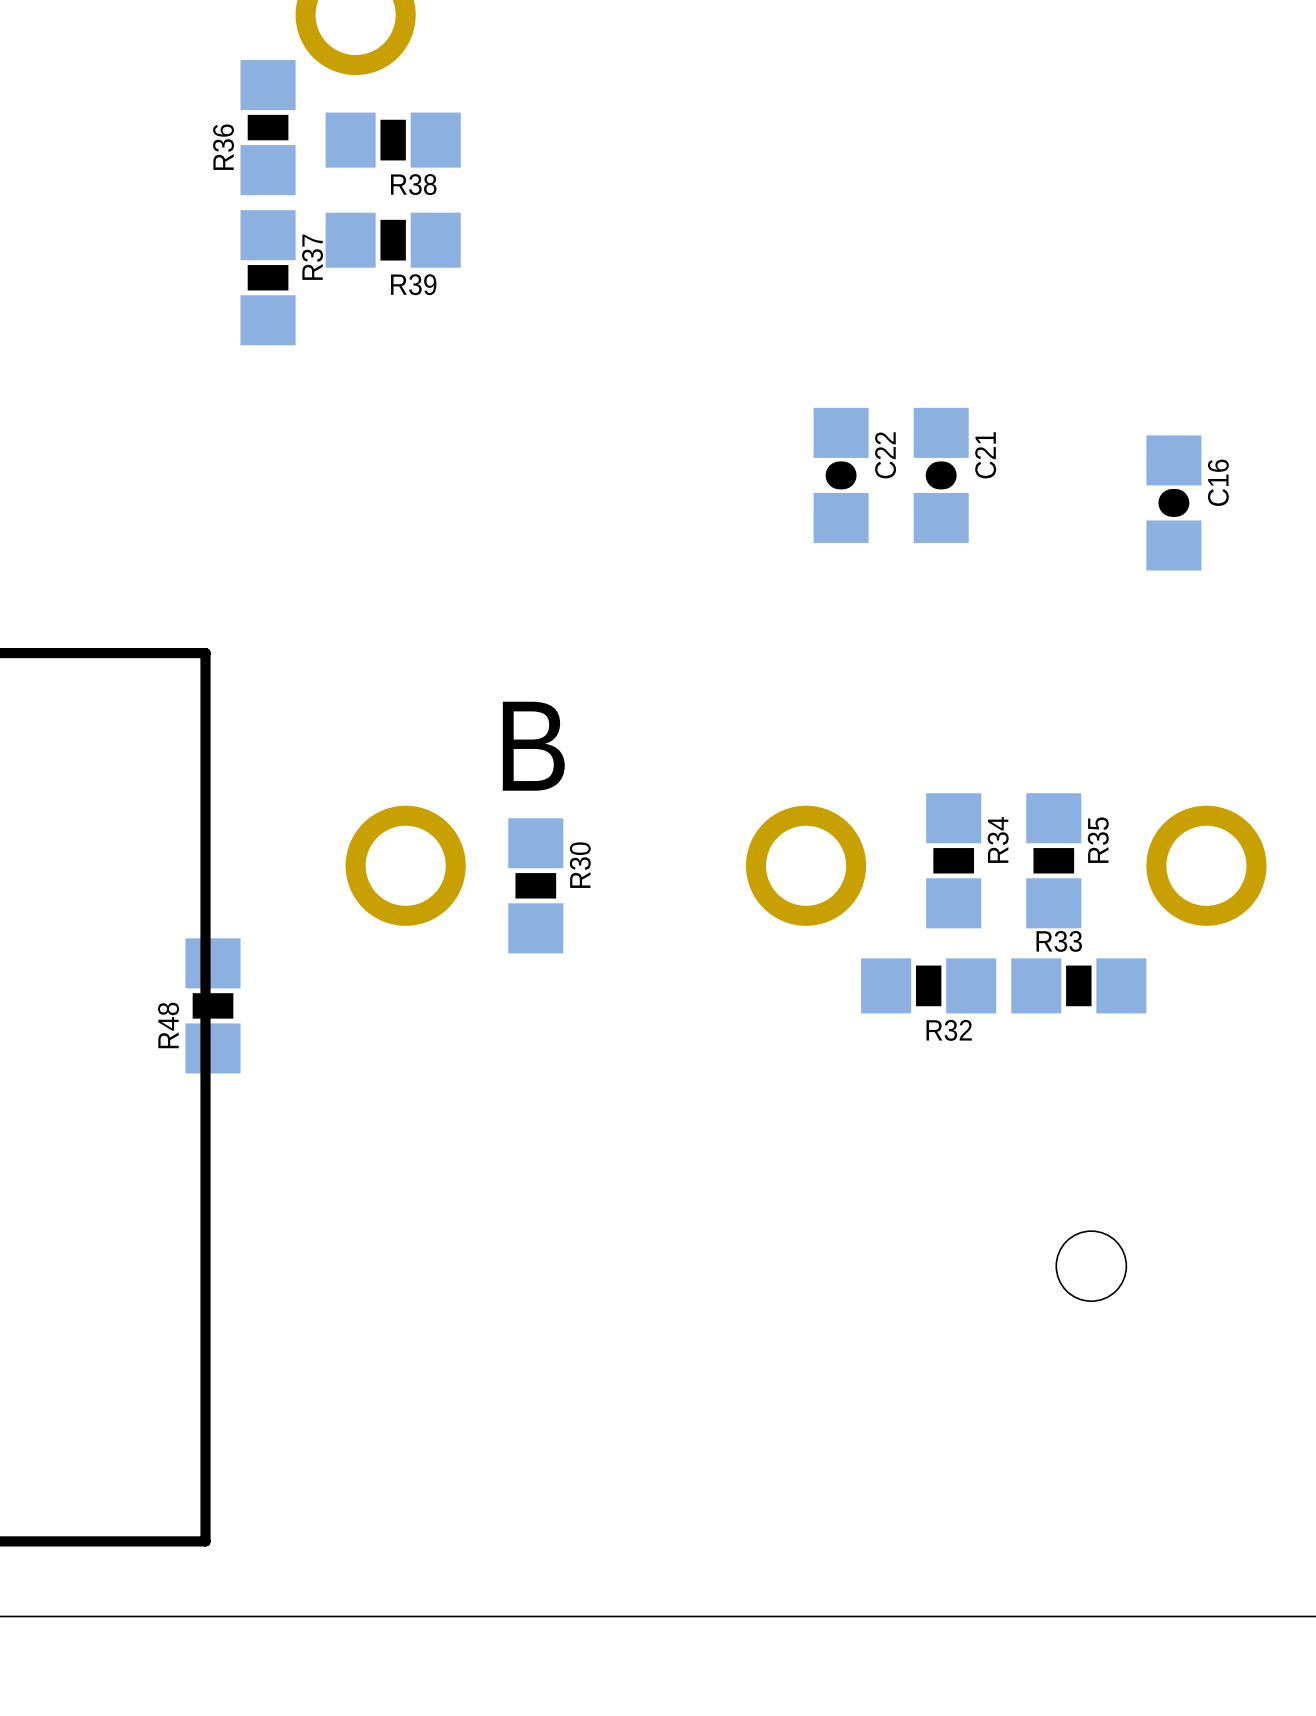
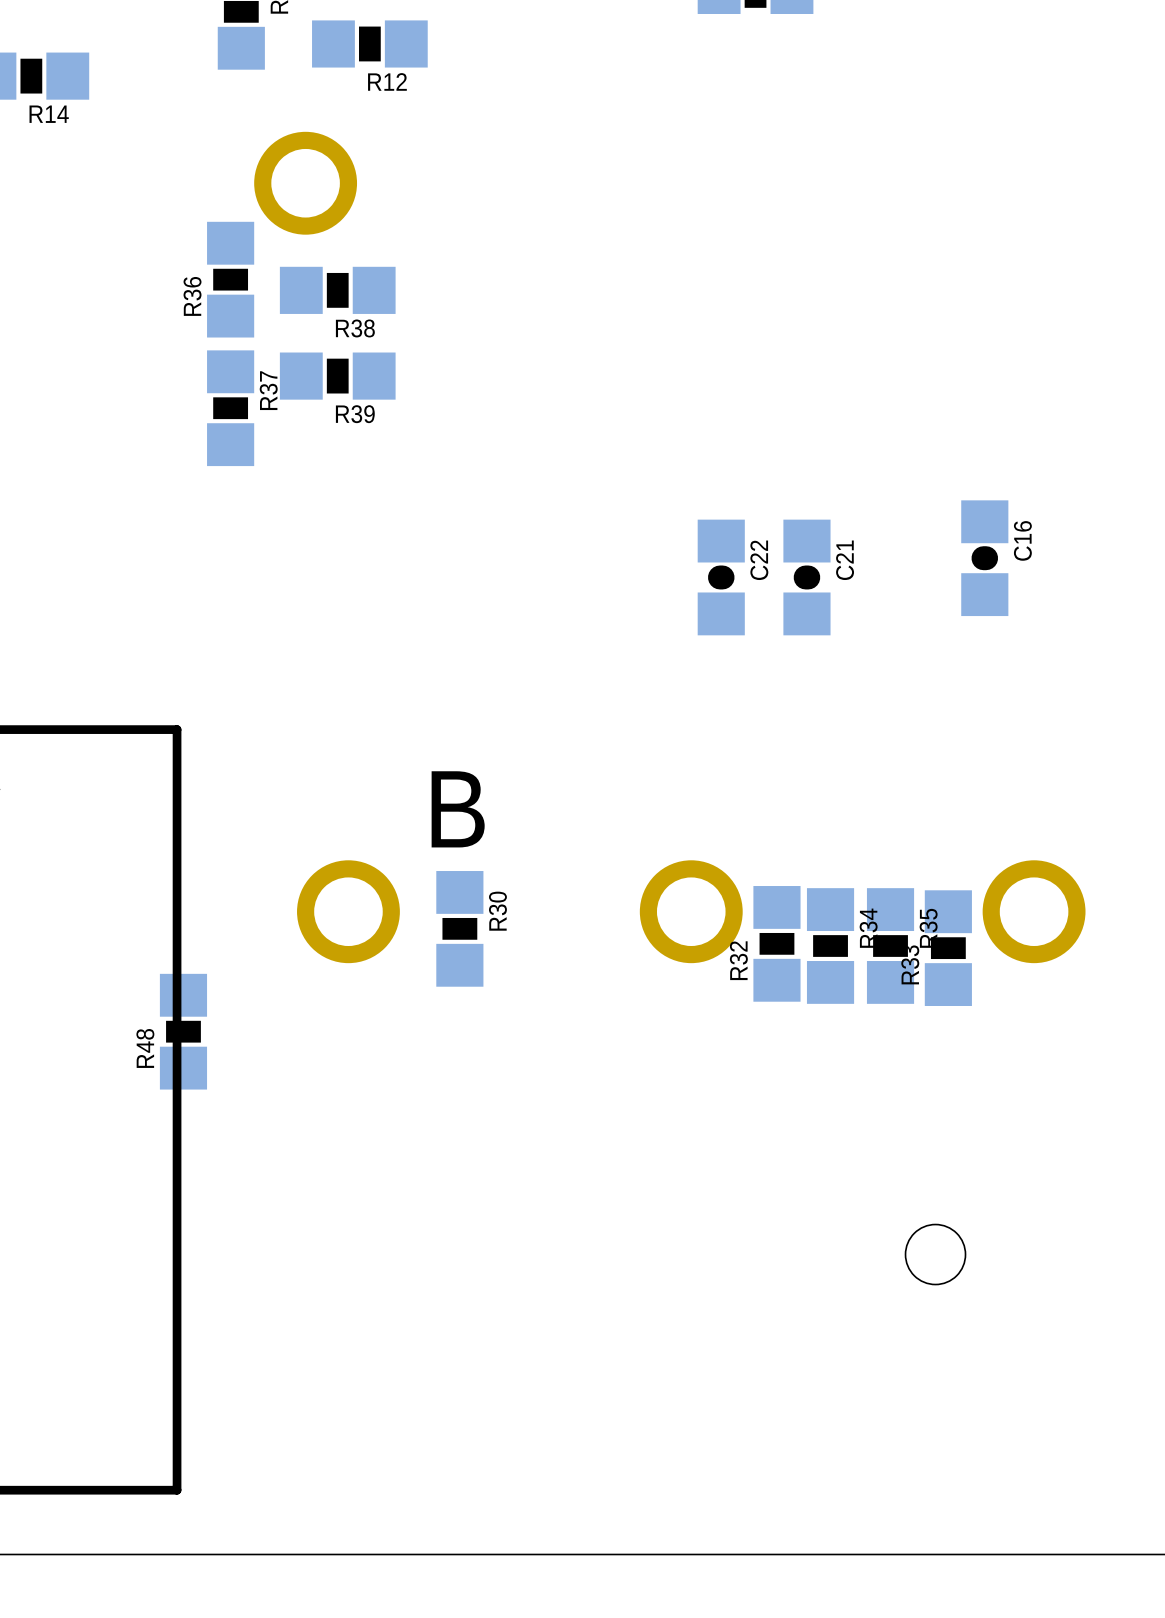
C16 position: (1173, 502) -> (984, 558)
R34 position: (953, 860) -> (830, 946)
R35 position: (1053, 860) -> (890, 946)
R32 rotation: 0° (928, 985) -> 90° clockwise (776, 943)
R32 position: (928, 985) -> (776, 943)
R33 rotation: 0° (1078, 985) -> 90° clockwise (948, 948)
R33 position: (1078, 985) -> (948, 948)

